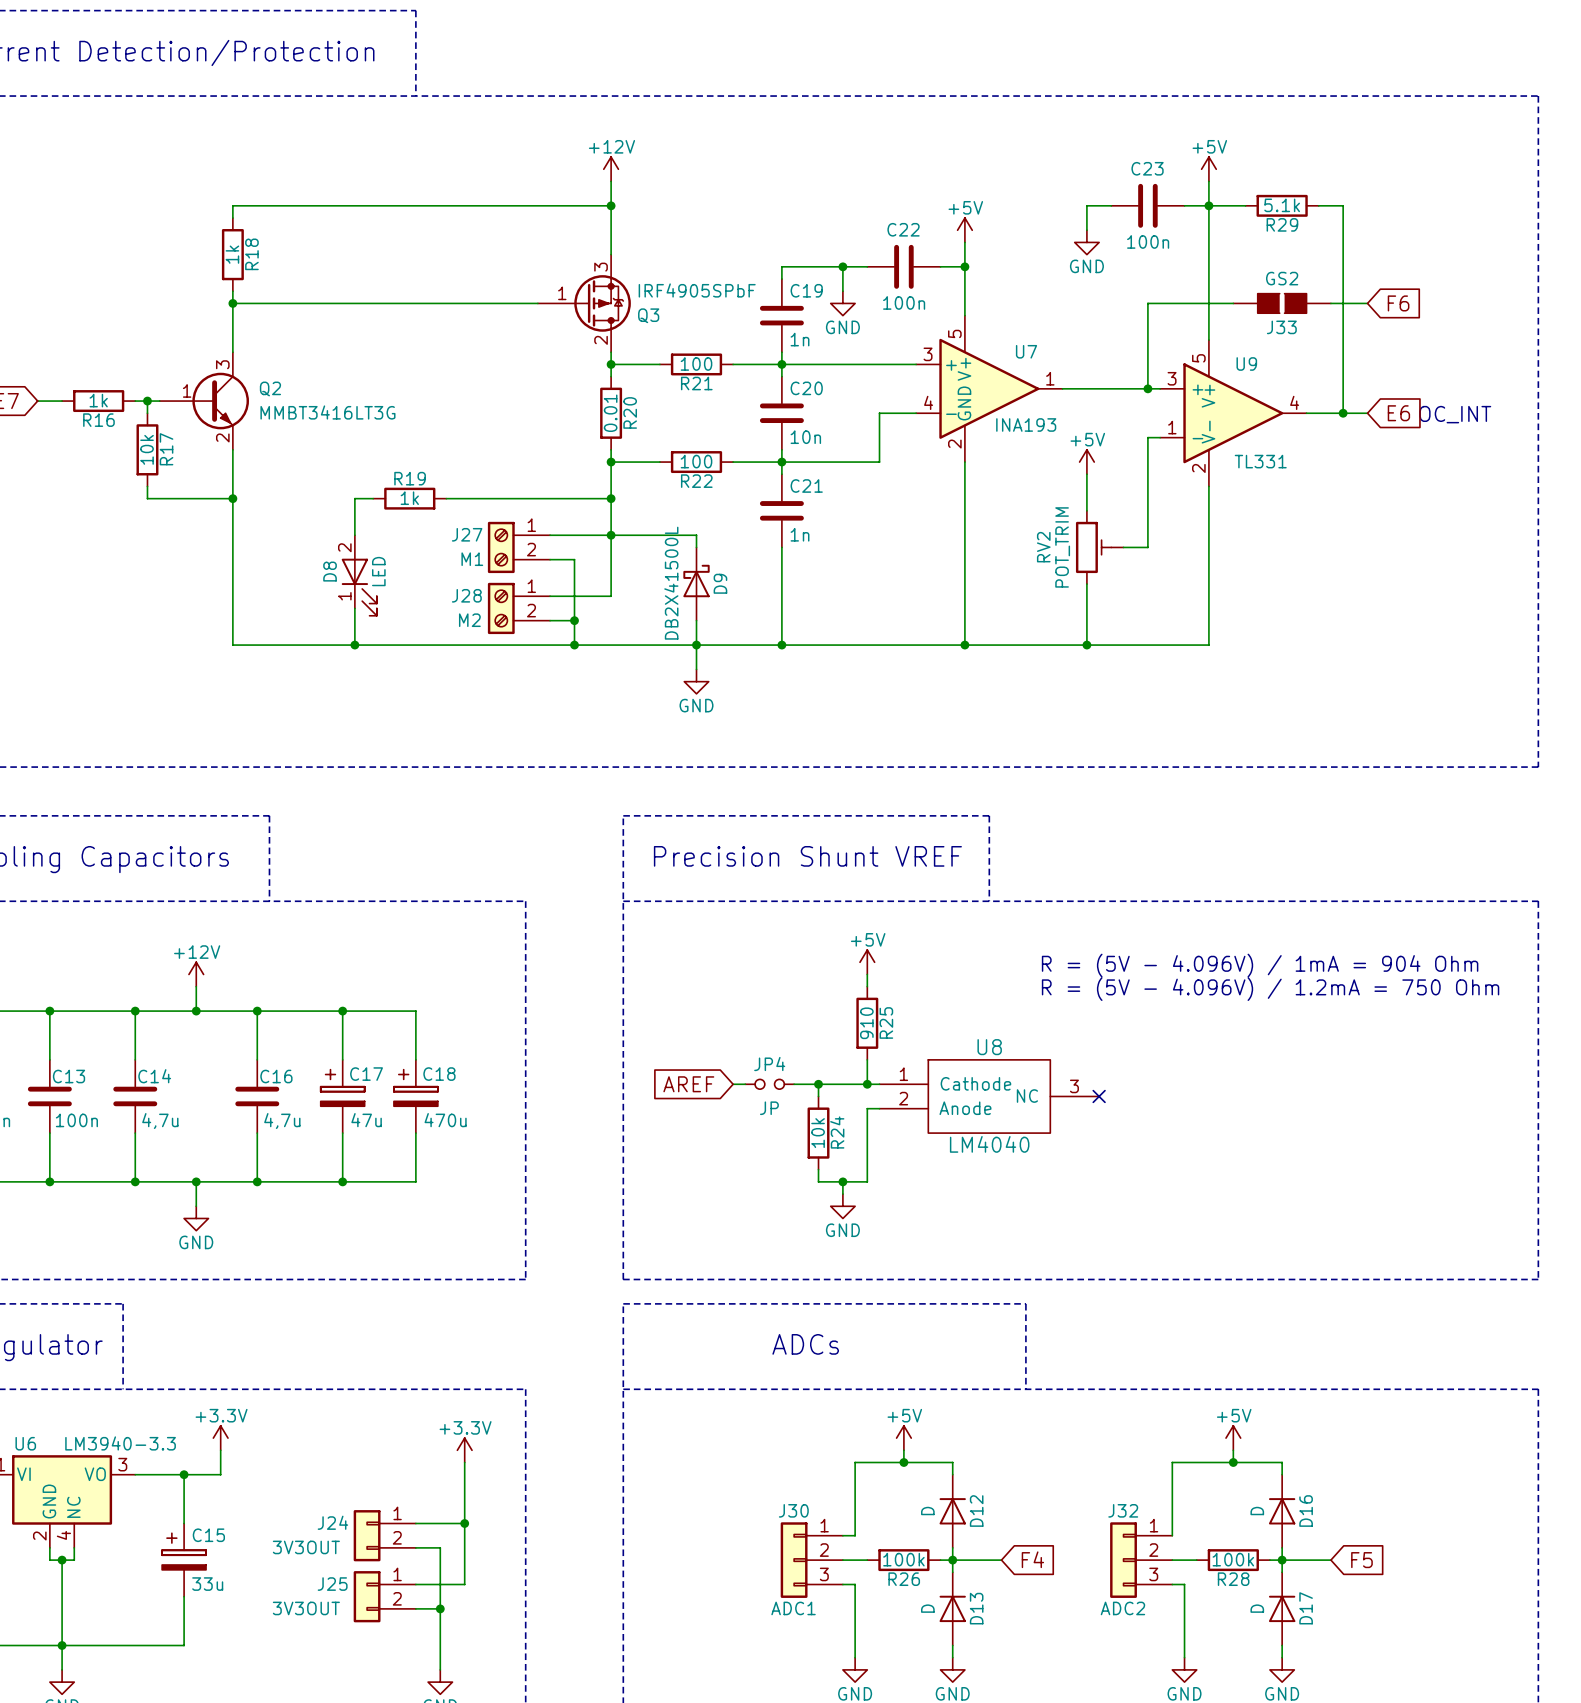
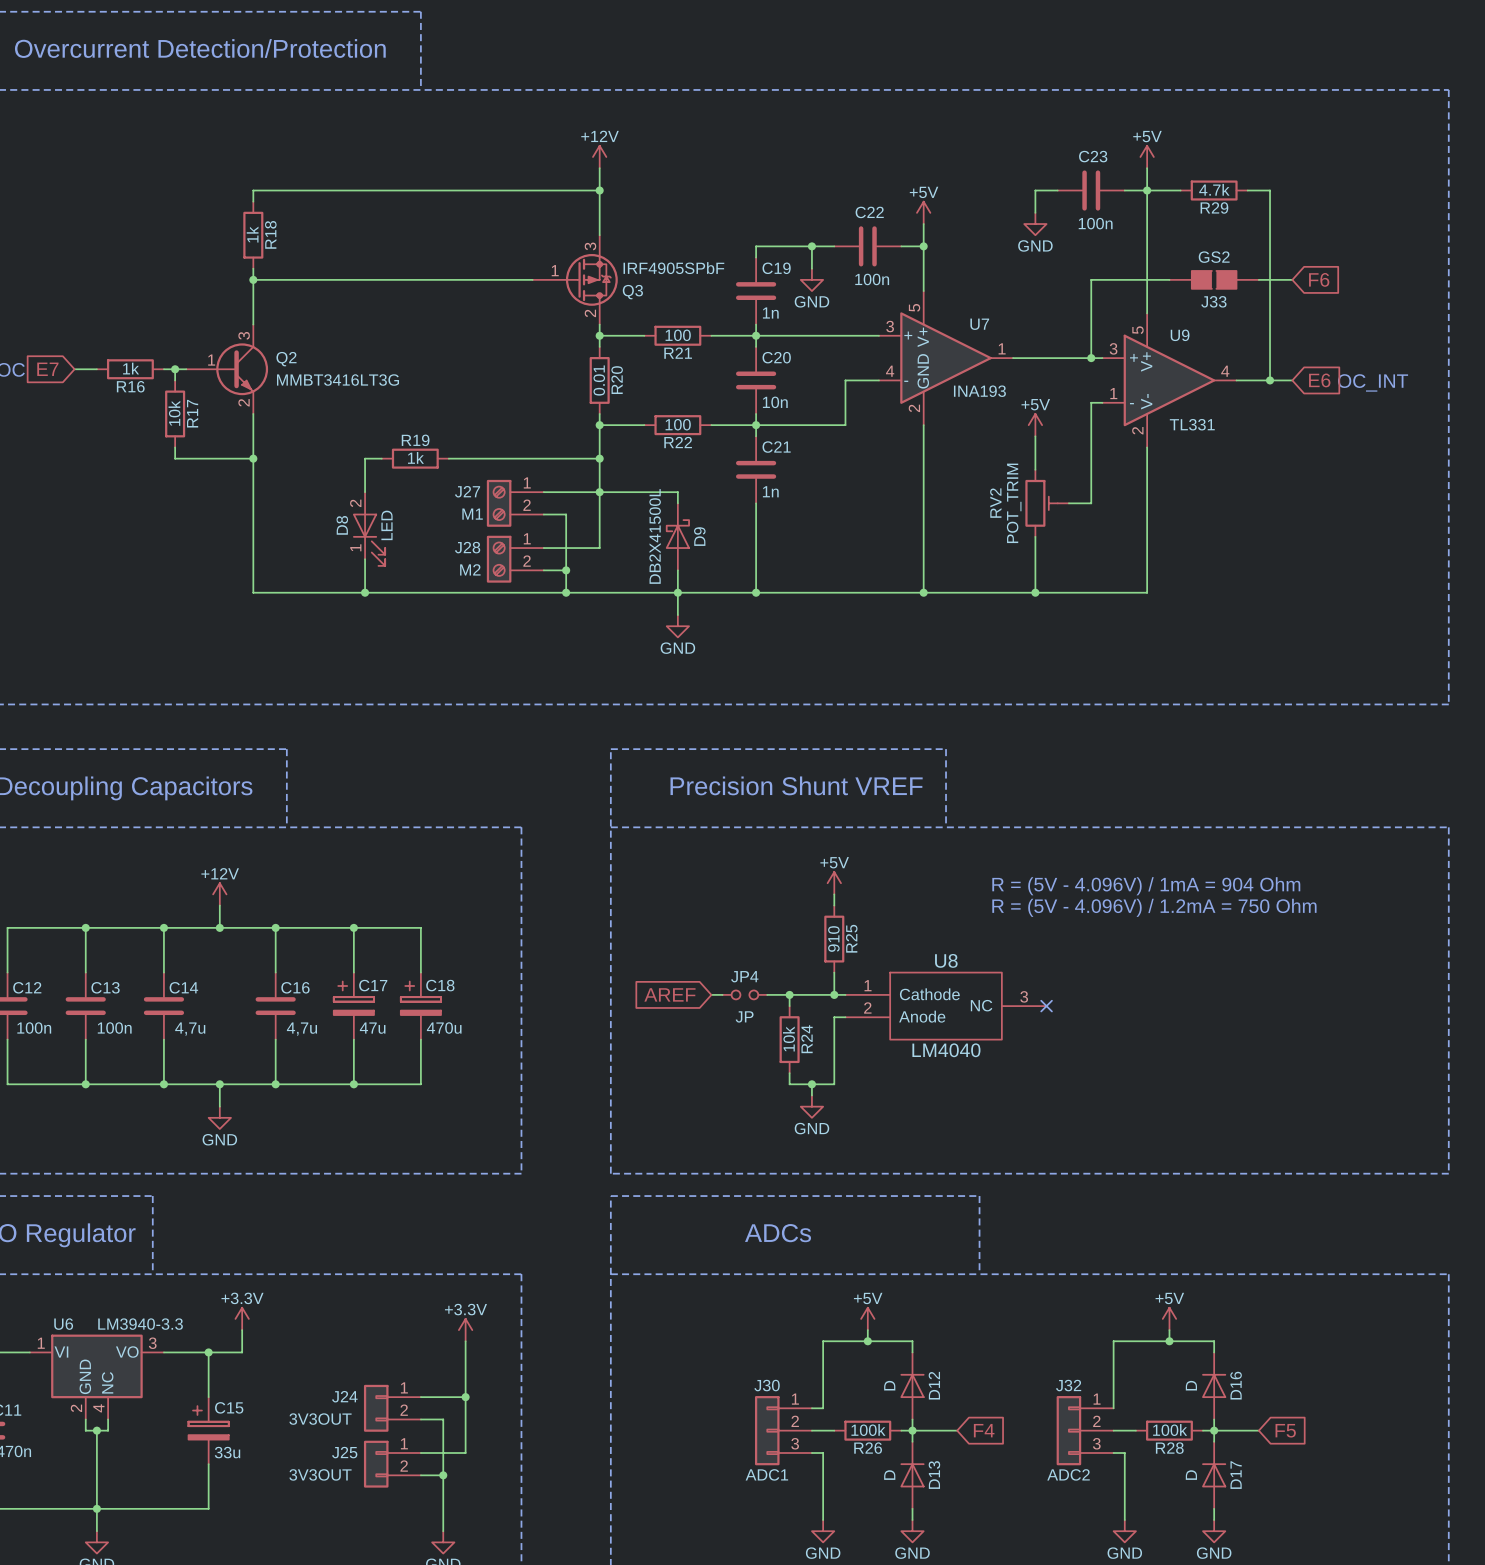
R29 value: 5.1k (1282, 205) -> 4.7k (1214, 189)

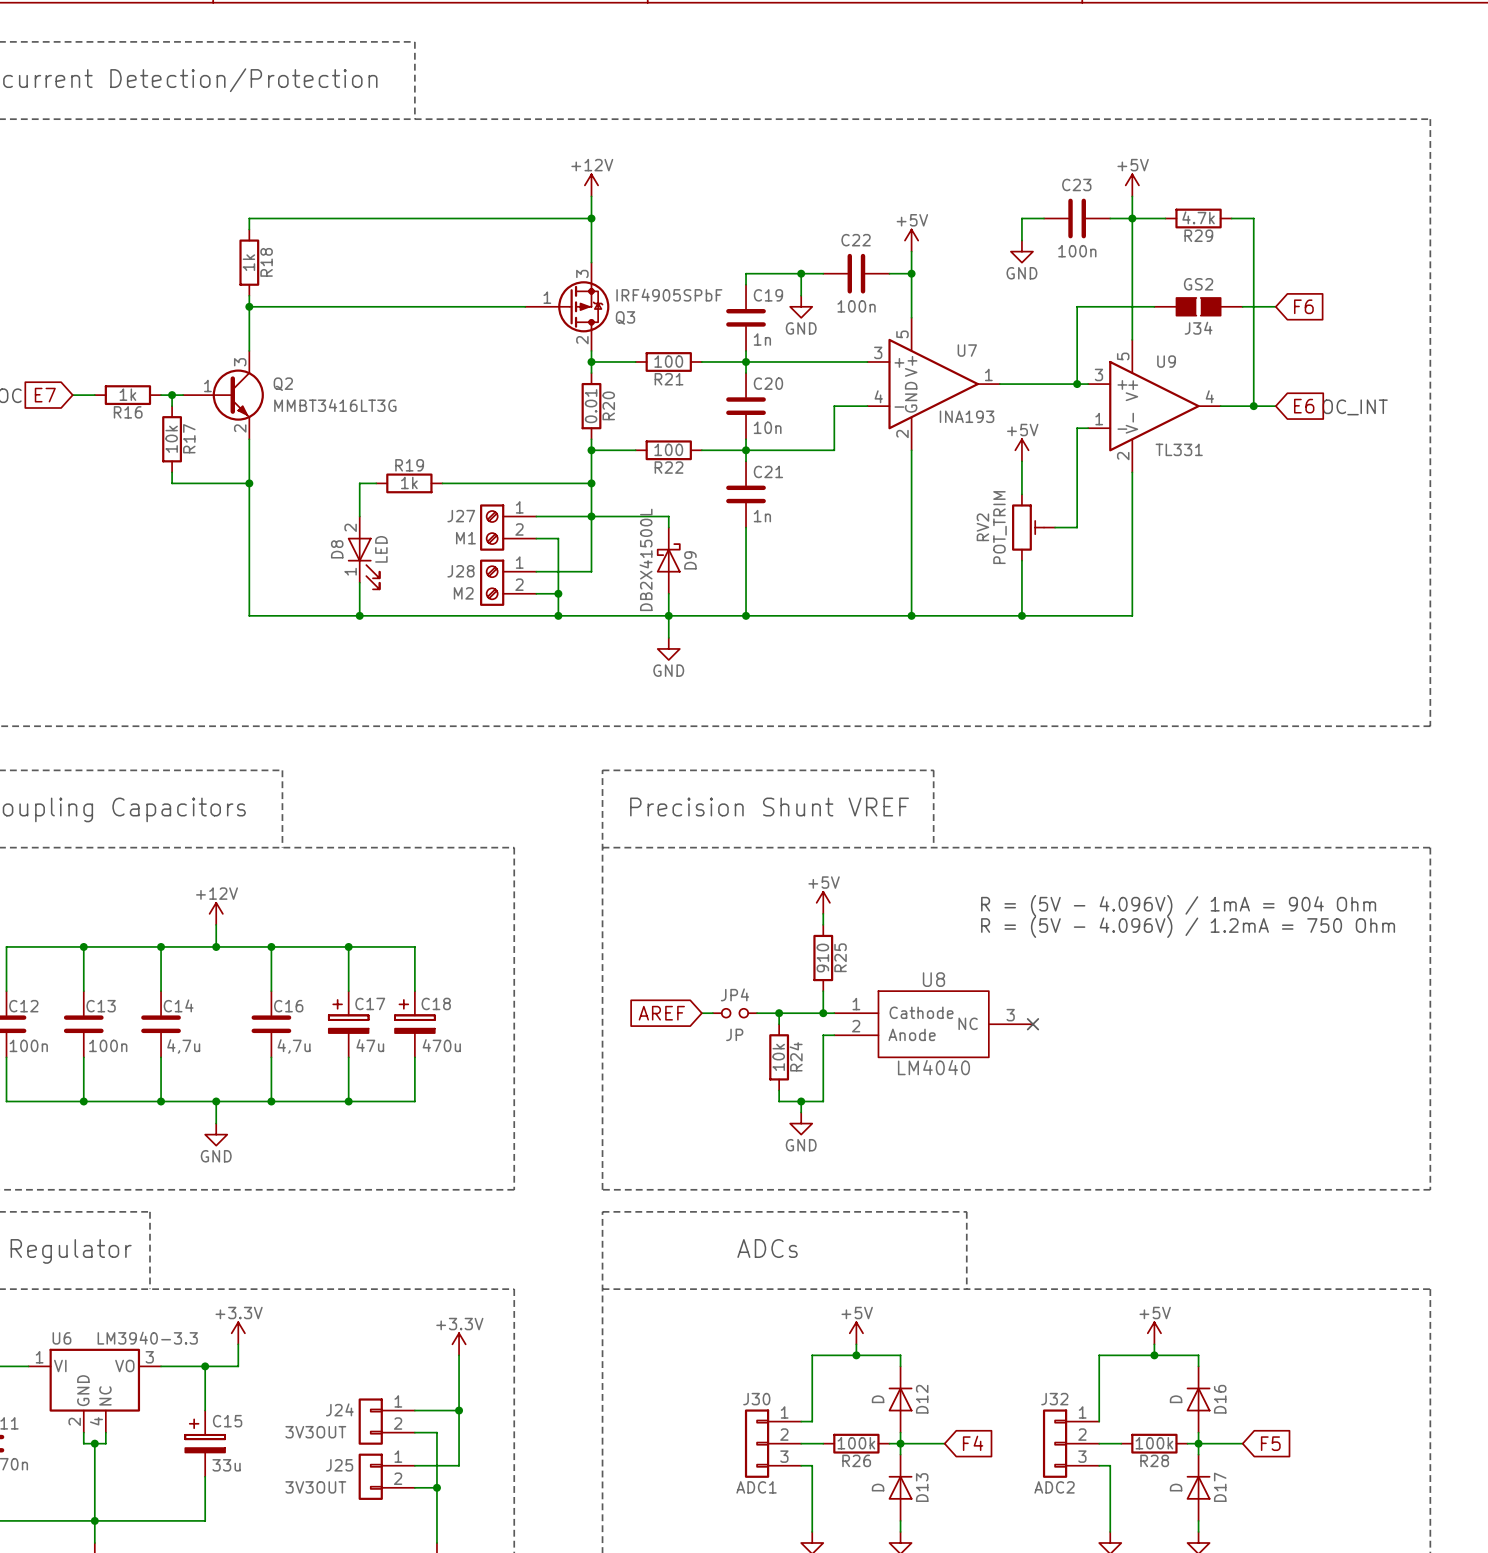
J33 name: J33 (1213, 301) -> J34 (1198, 328)

